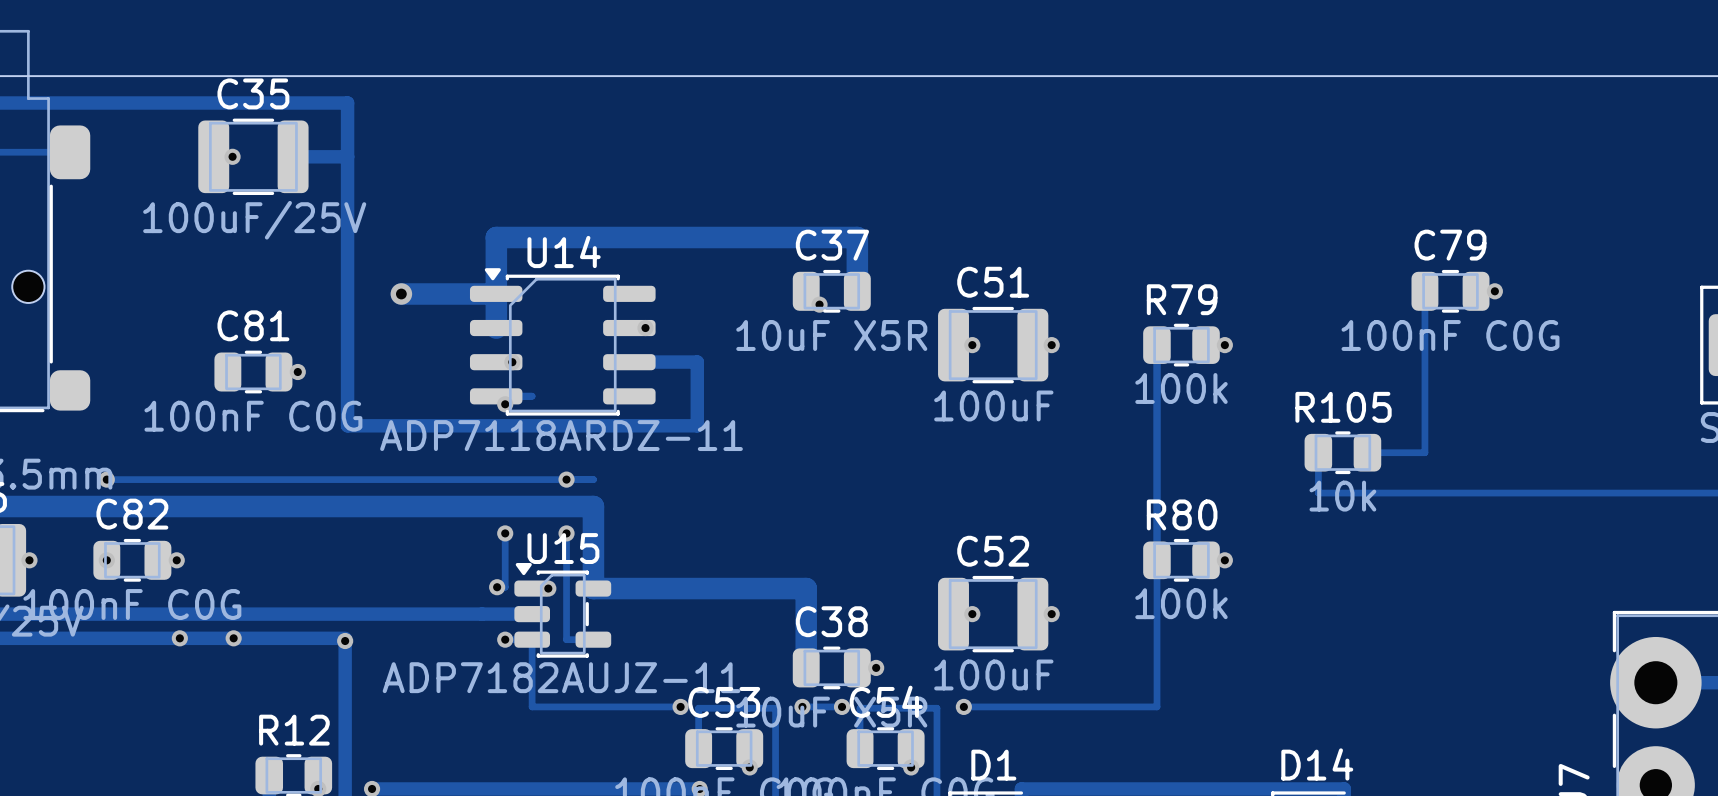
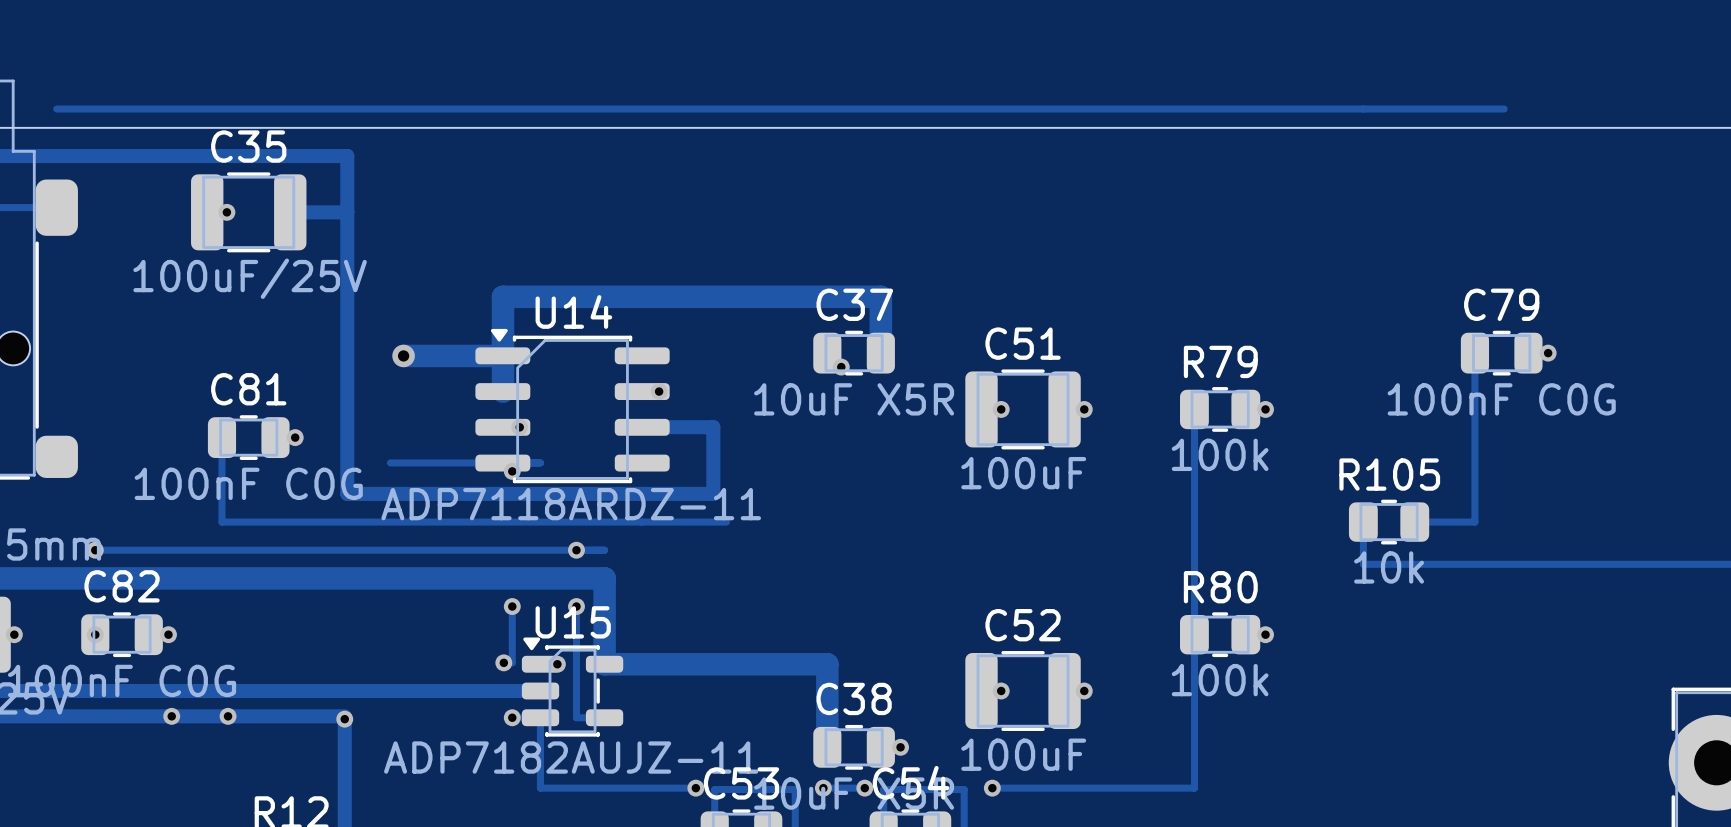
track: none -> (56, 109) (1504, 109)
track: none -> (221, 437) (221, 522) (726, 522)
track: none -> (390, 462) (502, 462)

